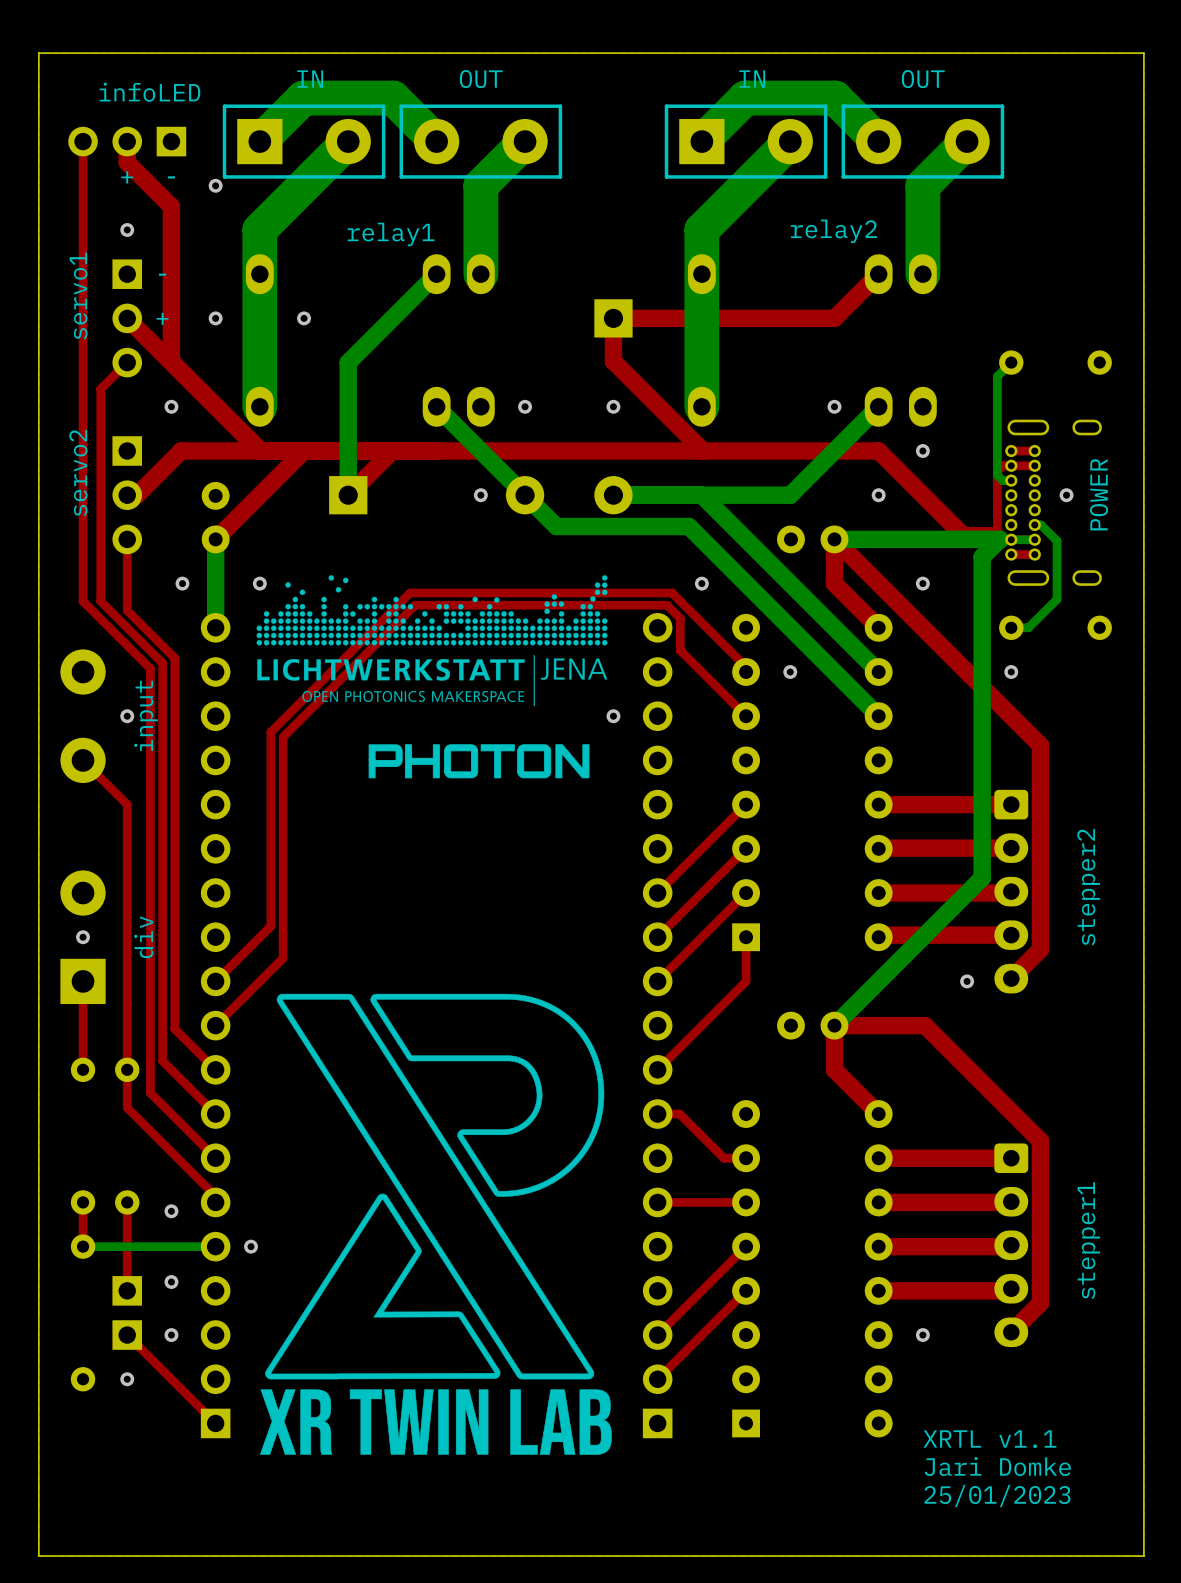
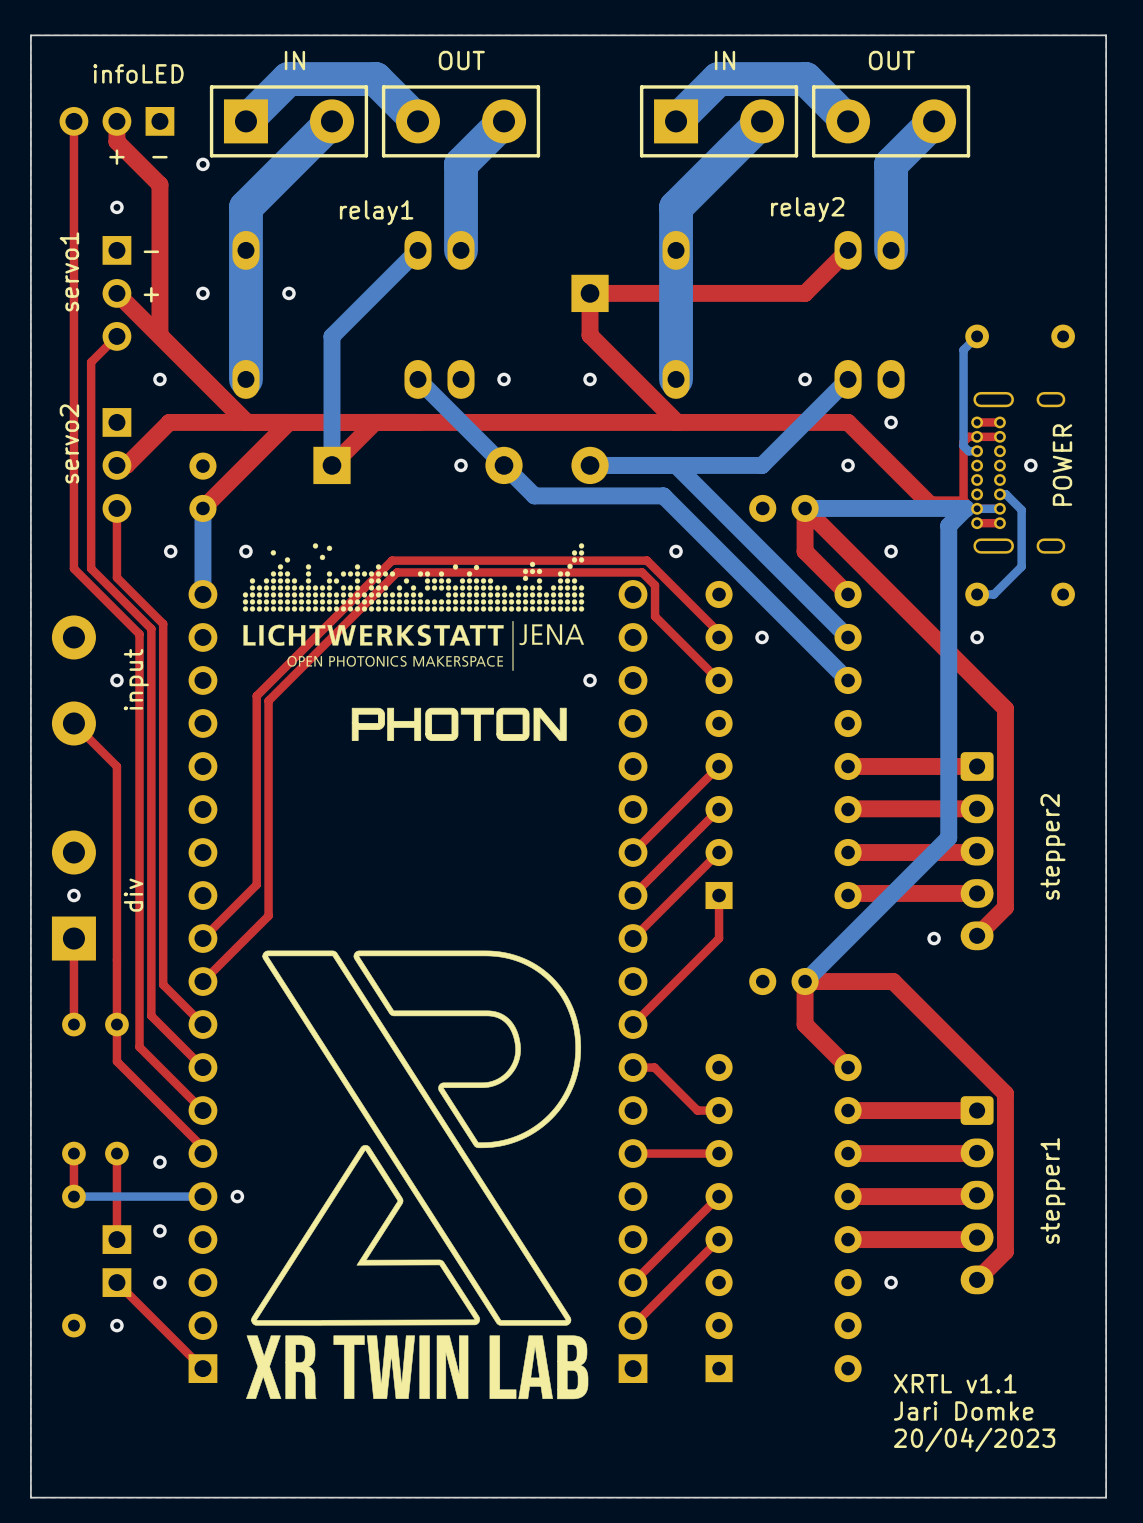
text: 25/01/2023 (997, 1495) -> 20/04/2023 (974, 1439)

